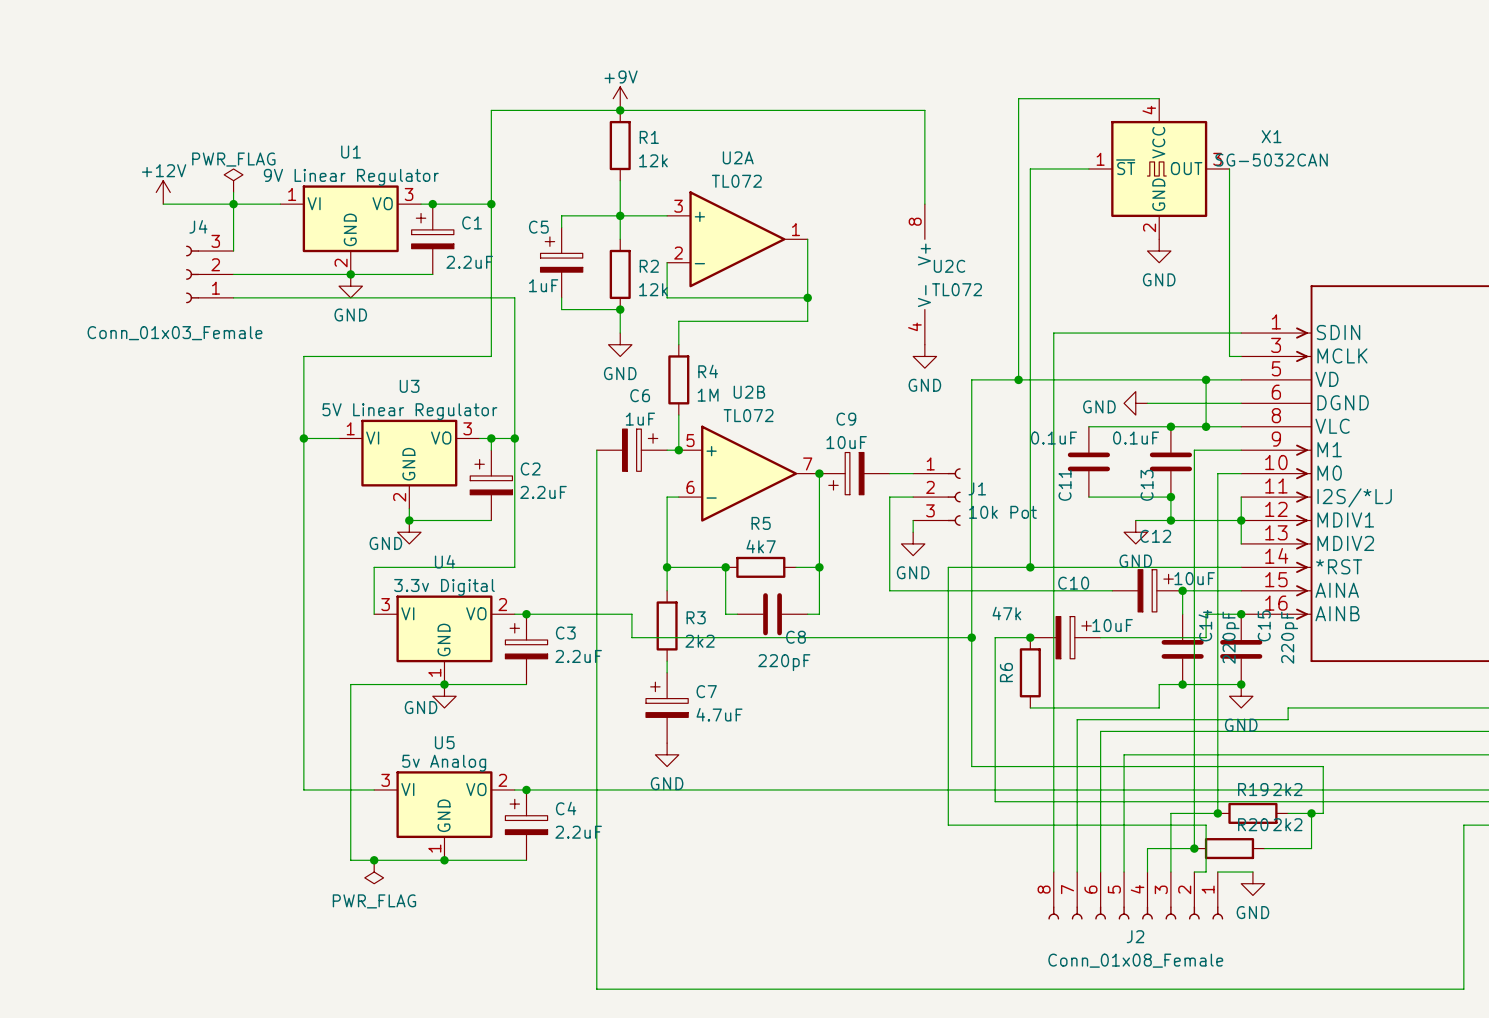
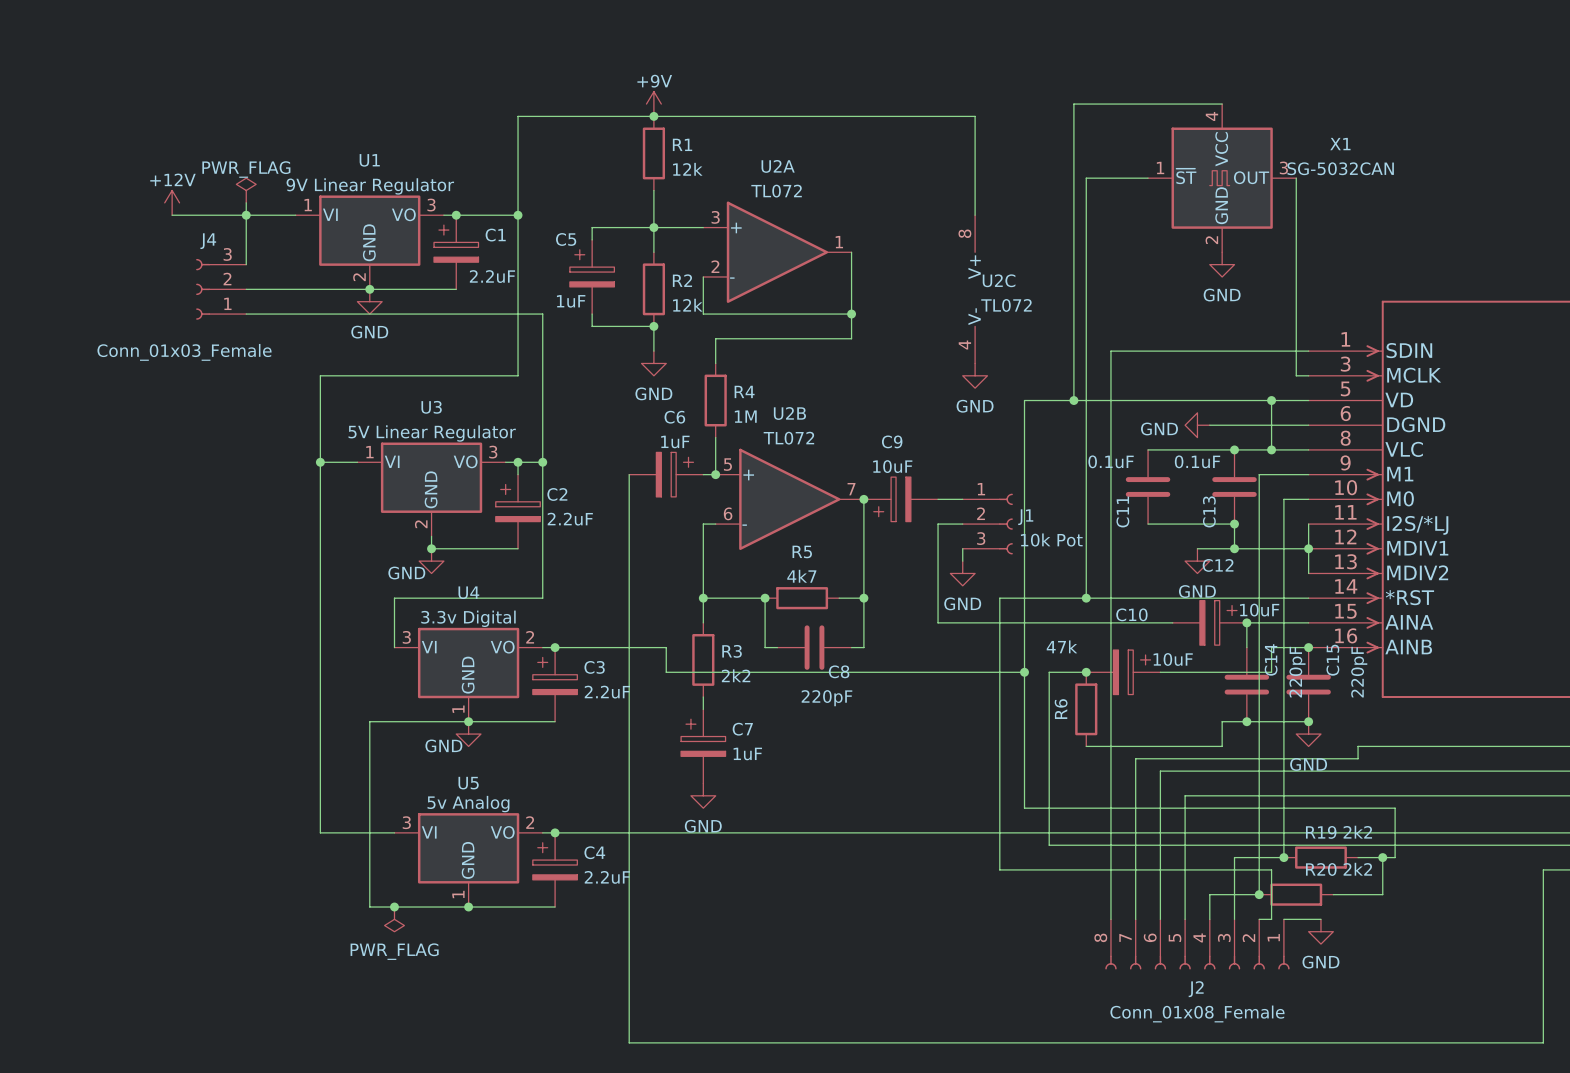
C7 value: 4.7uF (719, 714) -> 1uF (747, 753)

